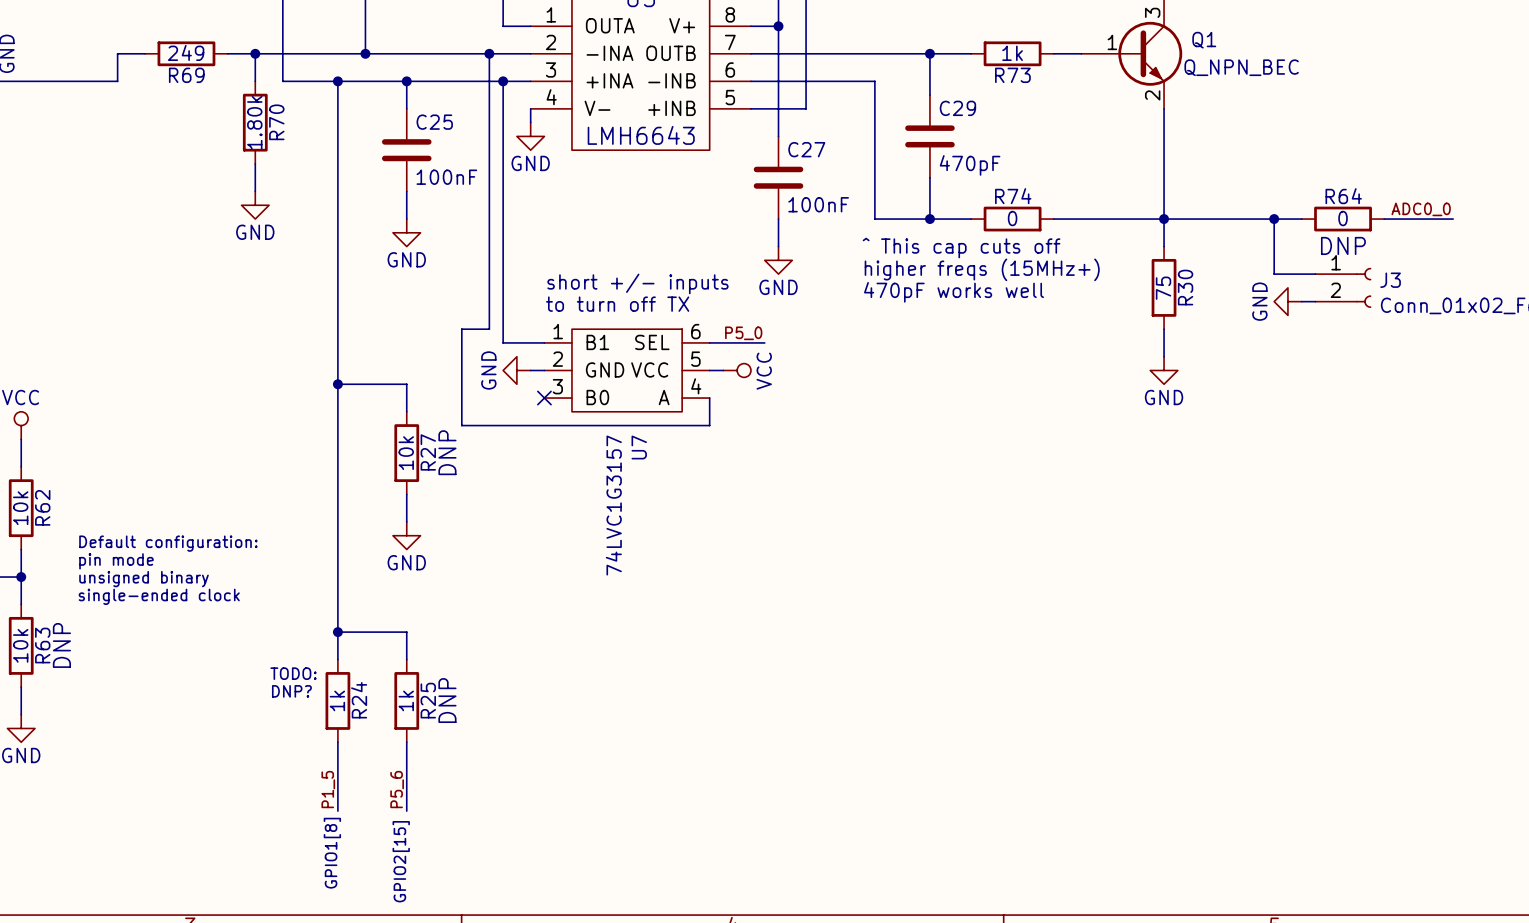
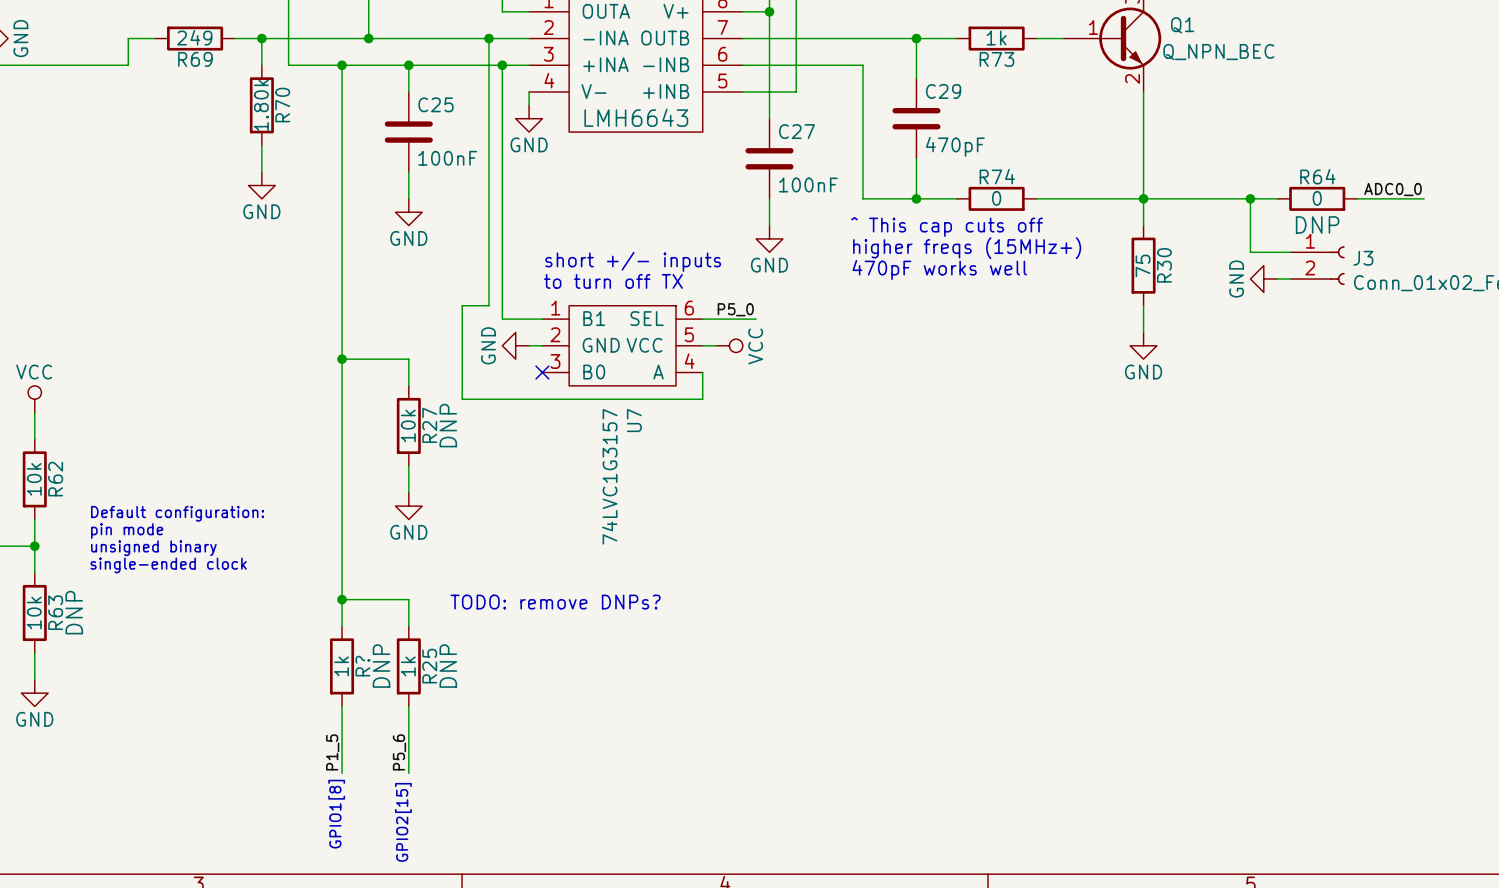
text: none -> TODO: remove DNPs? (555, 602)
text: TODO: (293, 673) -> none
text: DNP? (291, 691) -> none
R24 name: R24 (359, 700) -> R? (362, 666)
R24 text: none -> DNP (381, 666)

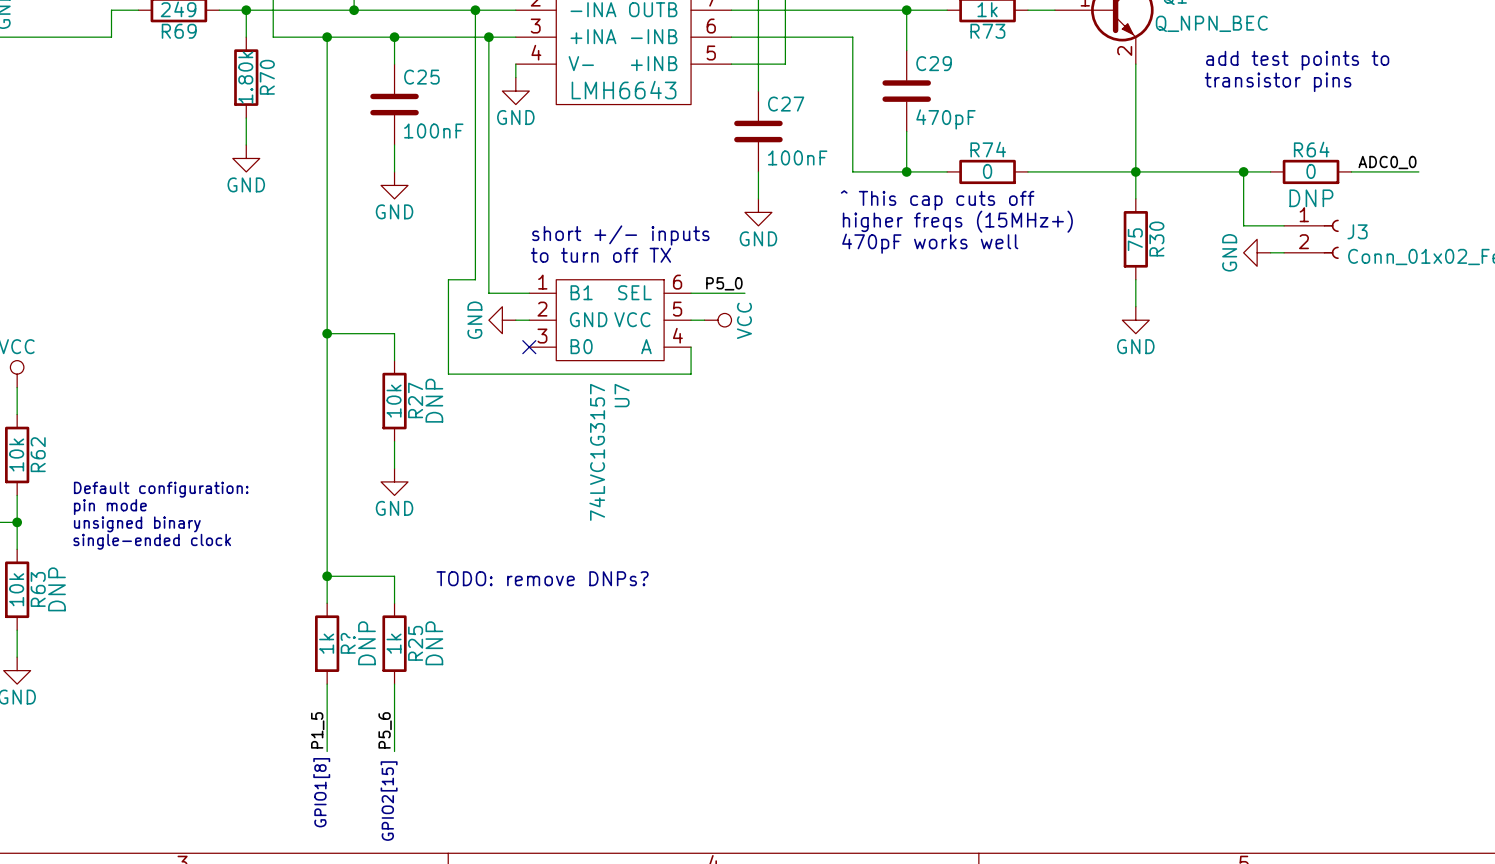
text: none -> add test points to (1297, 60)
text: none -> transistor pins (1278, 82)

